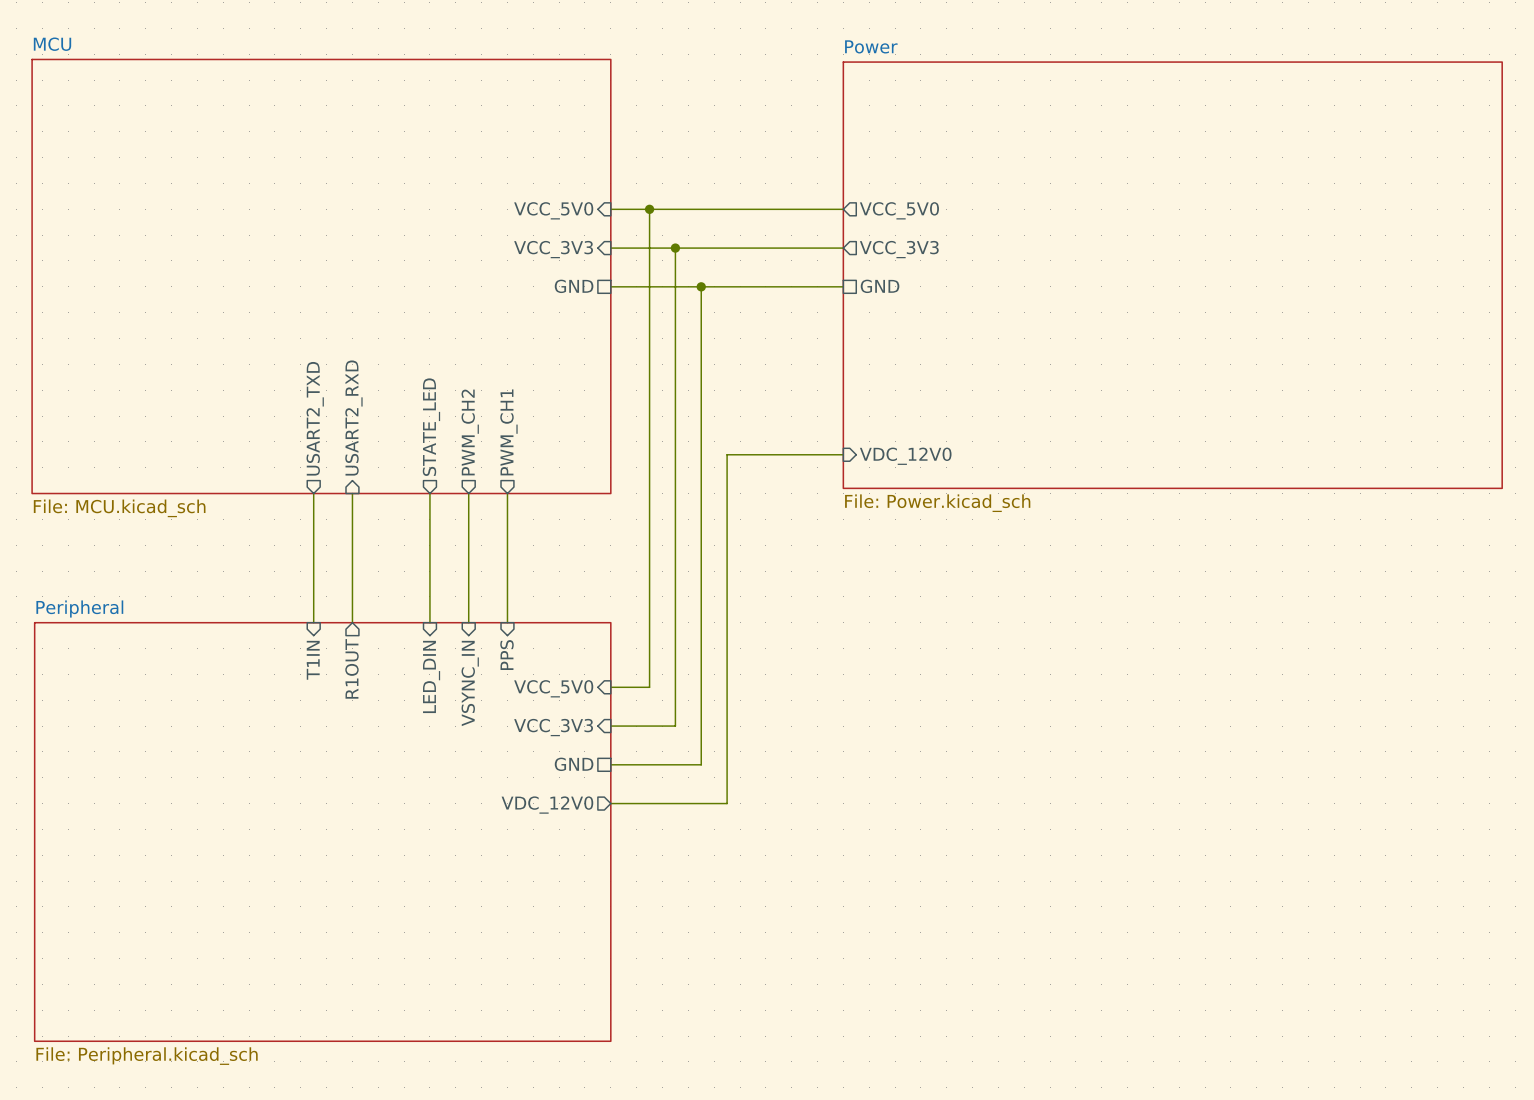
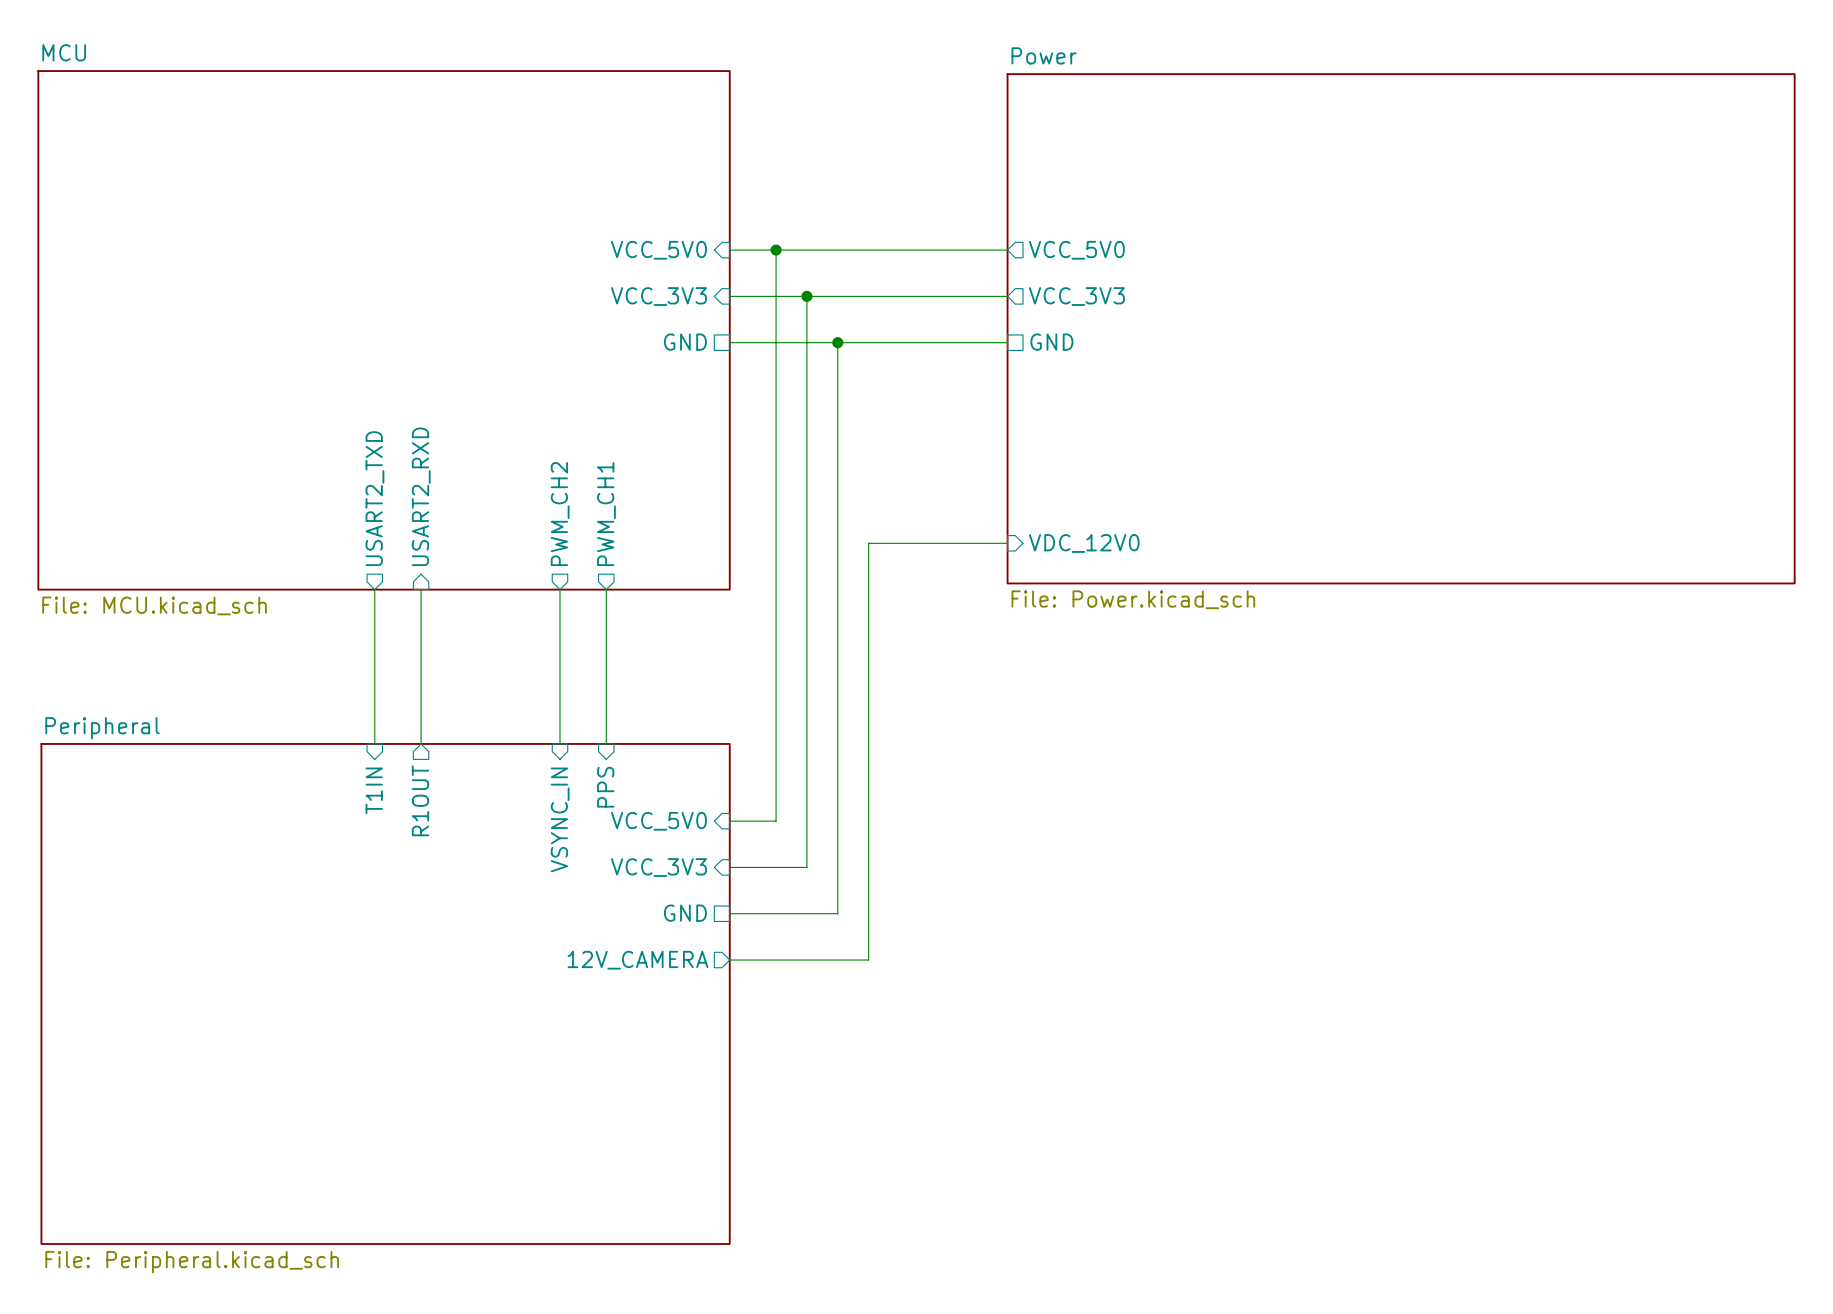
sheet pin: STATE_LED (431, 427) -> none
wire: (429, 493) (429, 622) -> none
sheet pin: LED_DIN (431, 676) -> none
sheet pin: VDC_12V0 (547, 805) -> 12V_CAMERA (638, 960)

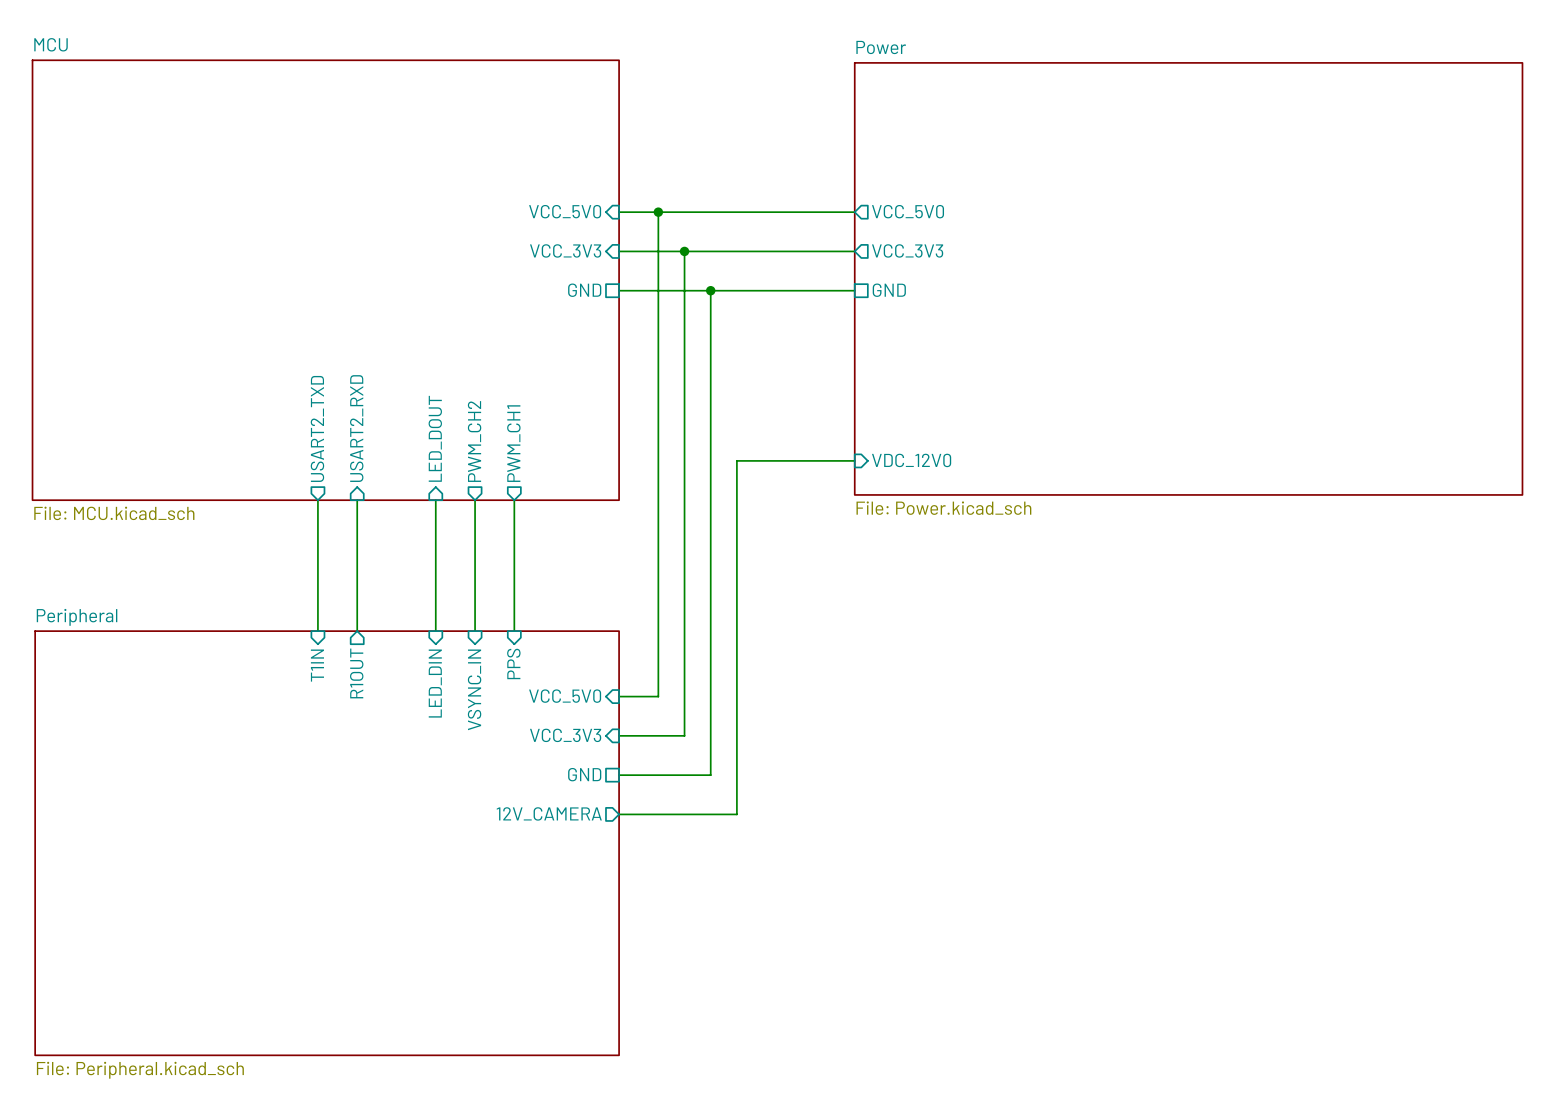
sheet pin: none -> LED_DOUT (435, 438)
wire: none -> (435, 500) (435, 631)
sheet pin: none -> LED_DIN (435, 683)

